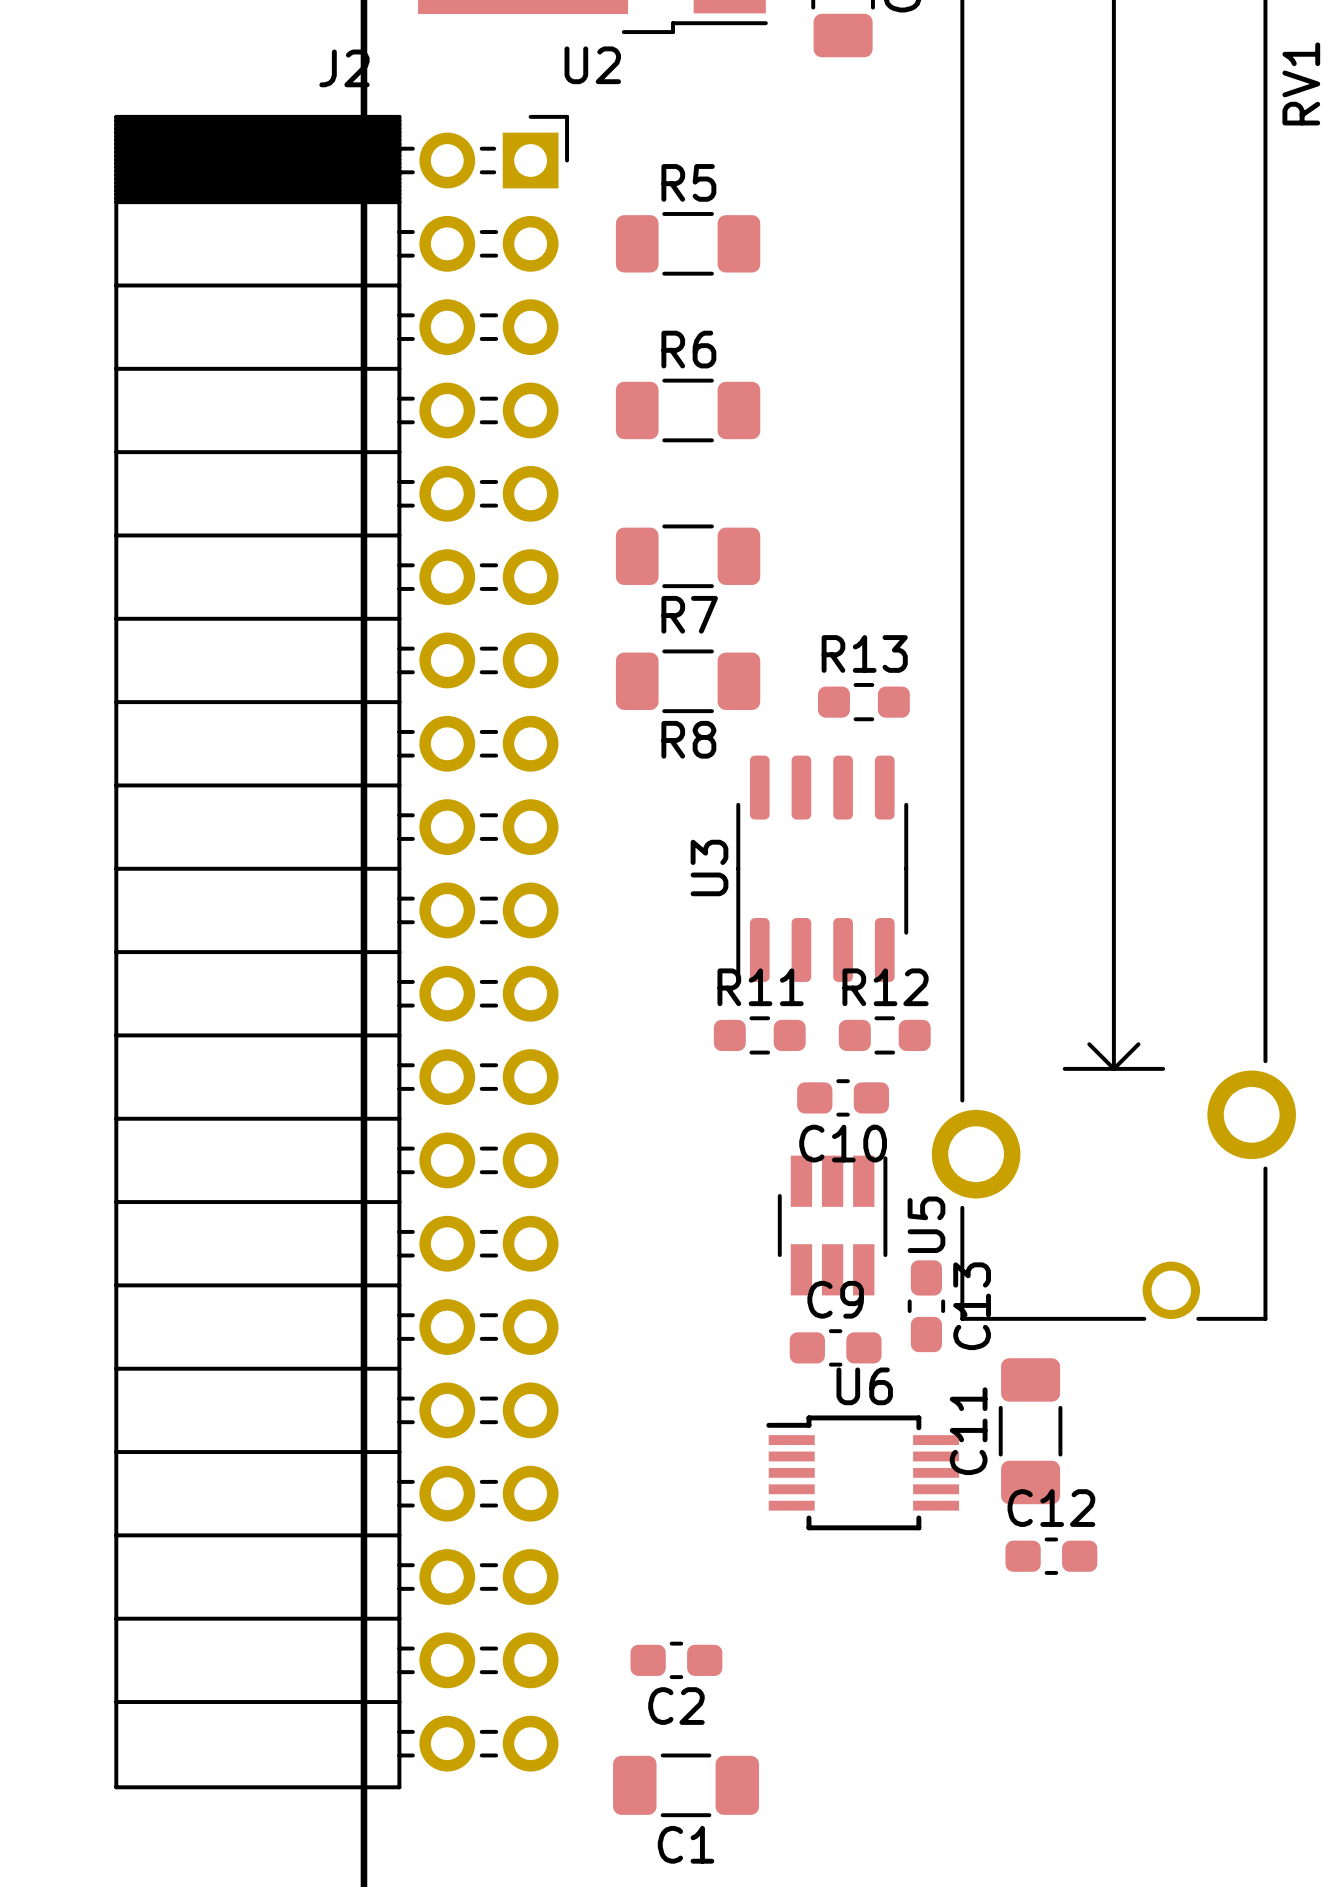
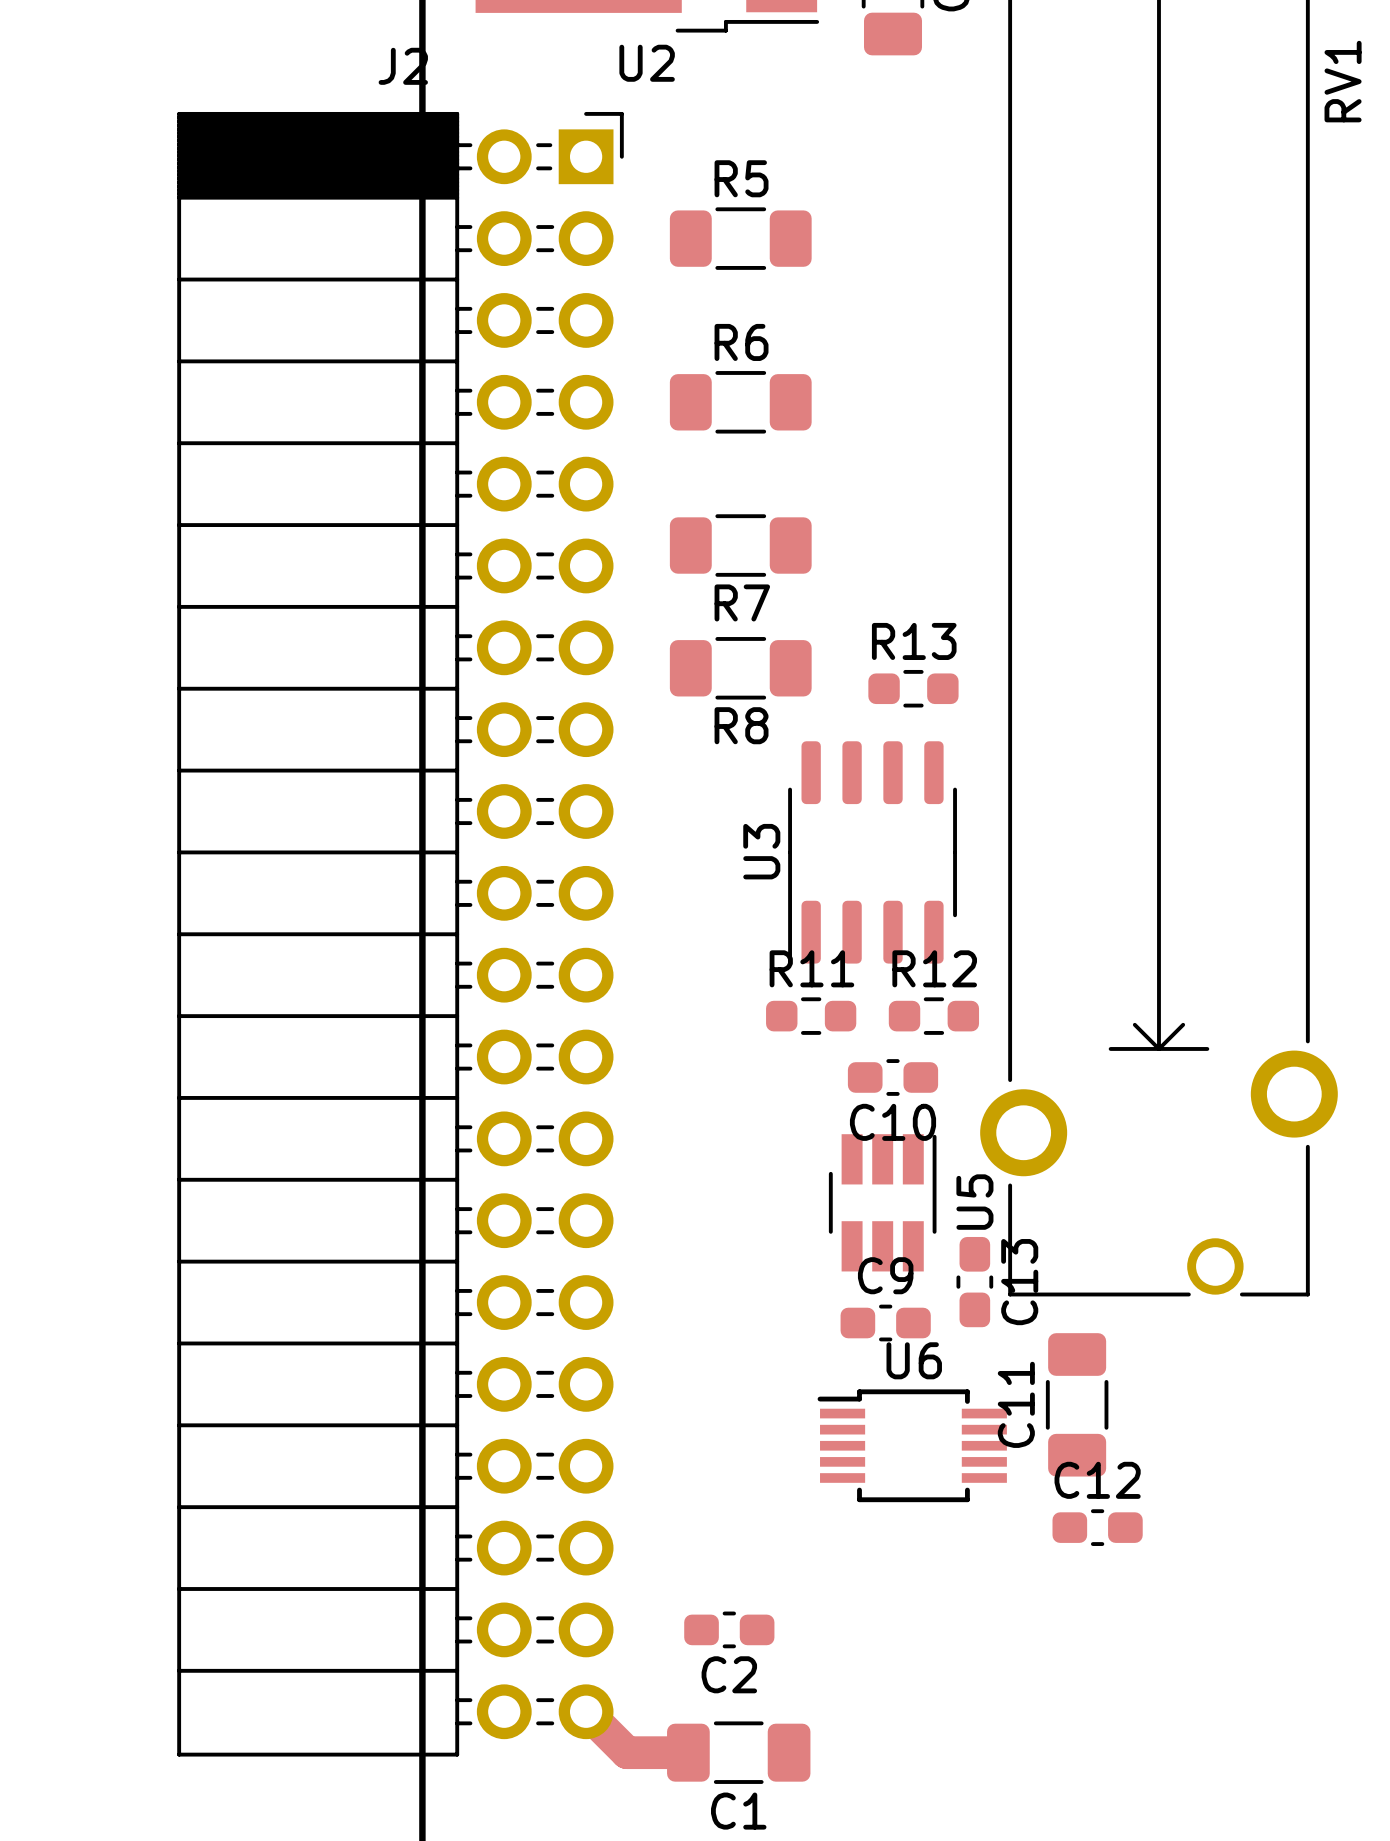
track: none -> (586, 1711) (627, 1752) (688, 1752)

